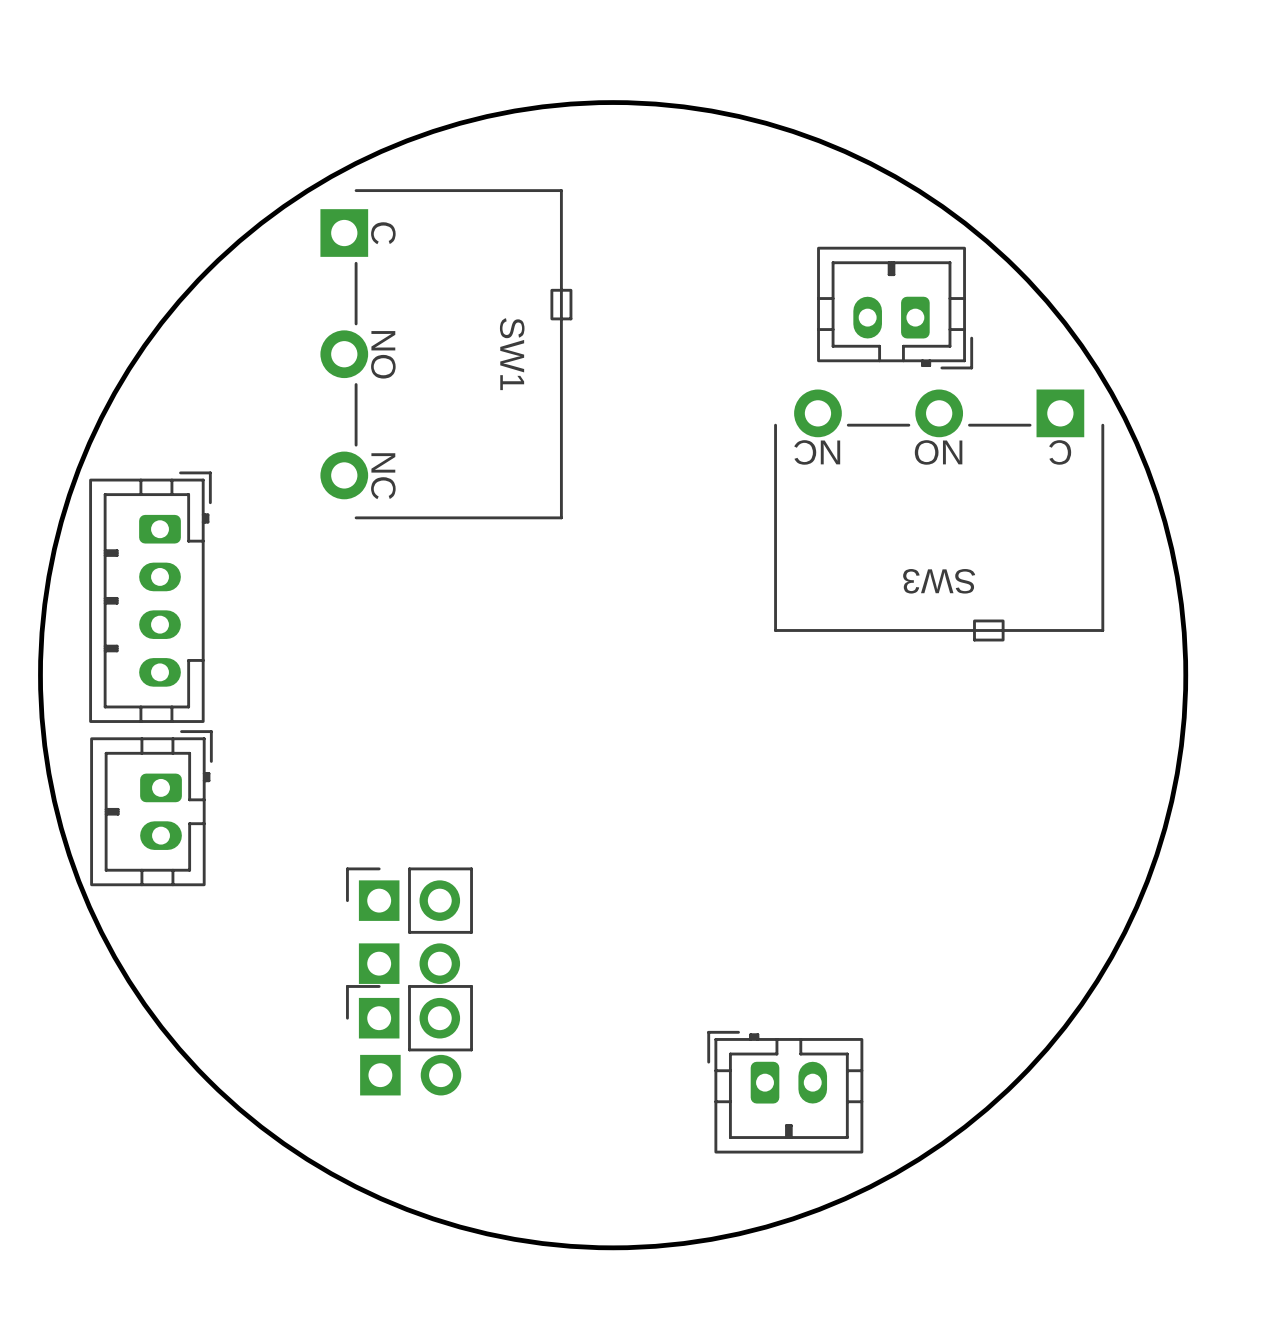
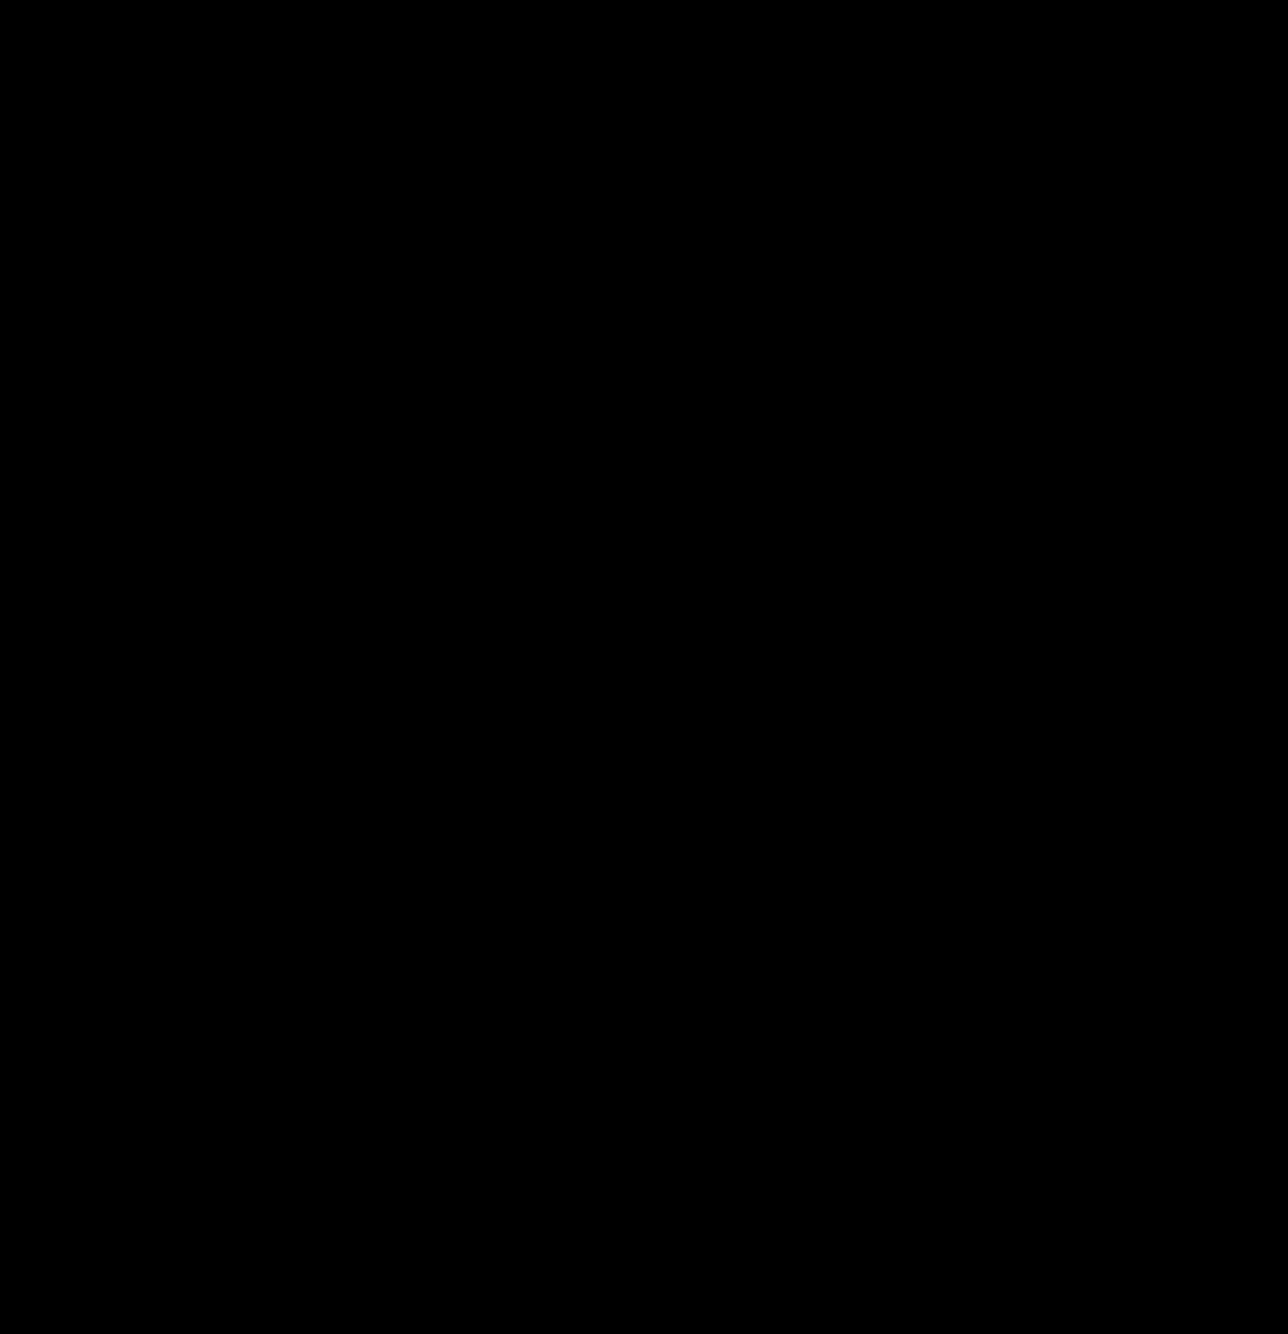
round board edge: [38, 100, 1189, 1251] -> none
part: (895, 308) -> none
SW1: (446, 354) -> none
SW3: (939, 515) -> none
part: (150, 597) -> none
part: (151, 808) -> none
part: (409, 900) -> none
part: (409, 963) -> none
part: (409, 1018) -> none
part: (410, 1075) -> none
part: (785, 1092) -> none

